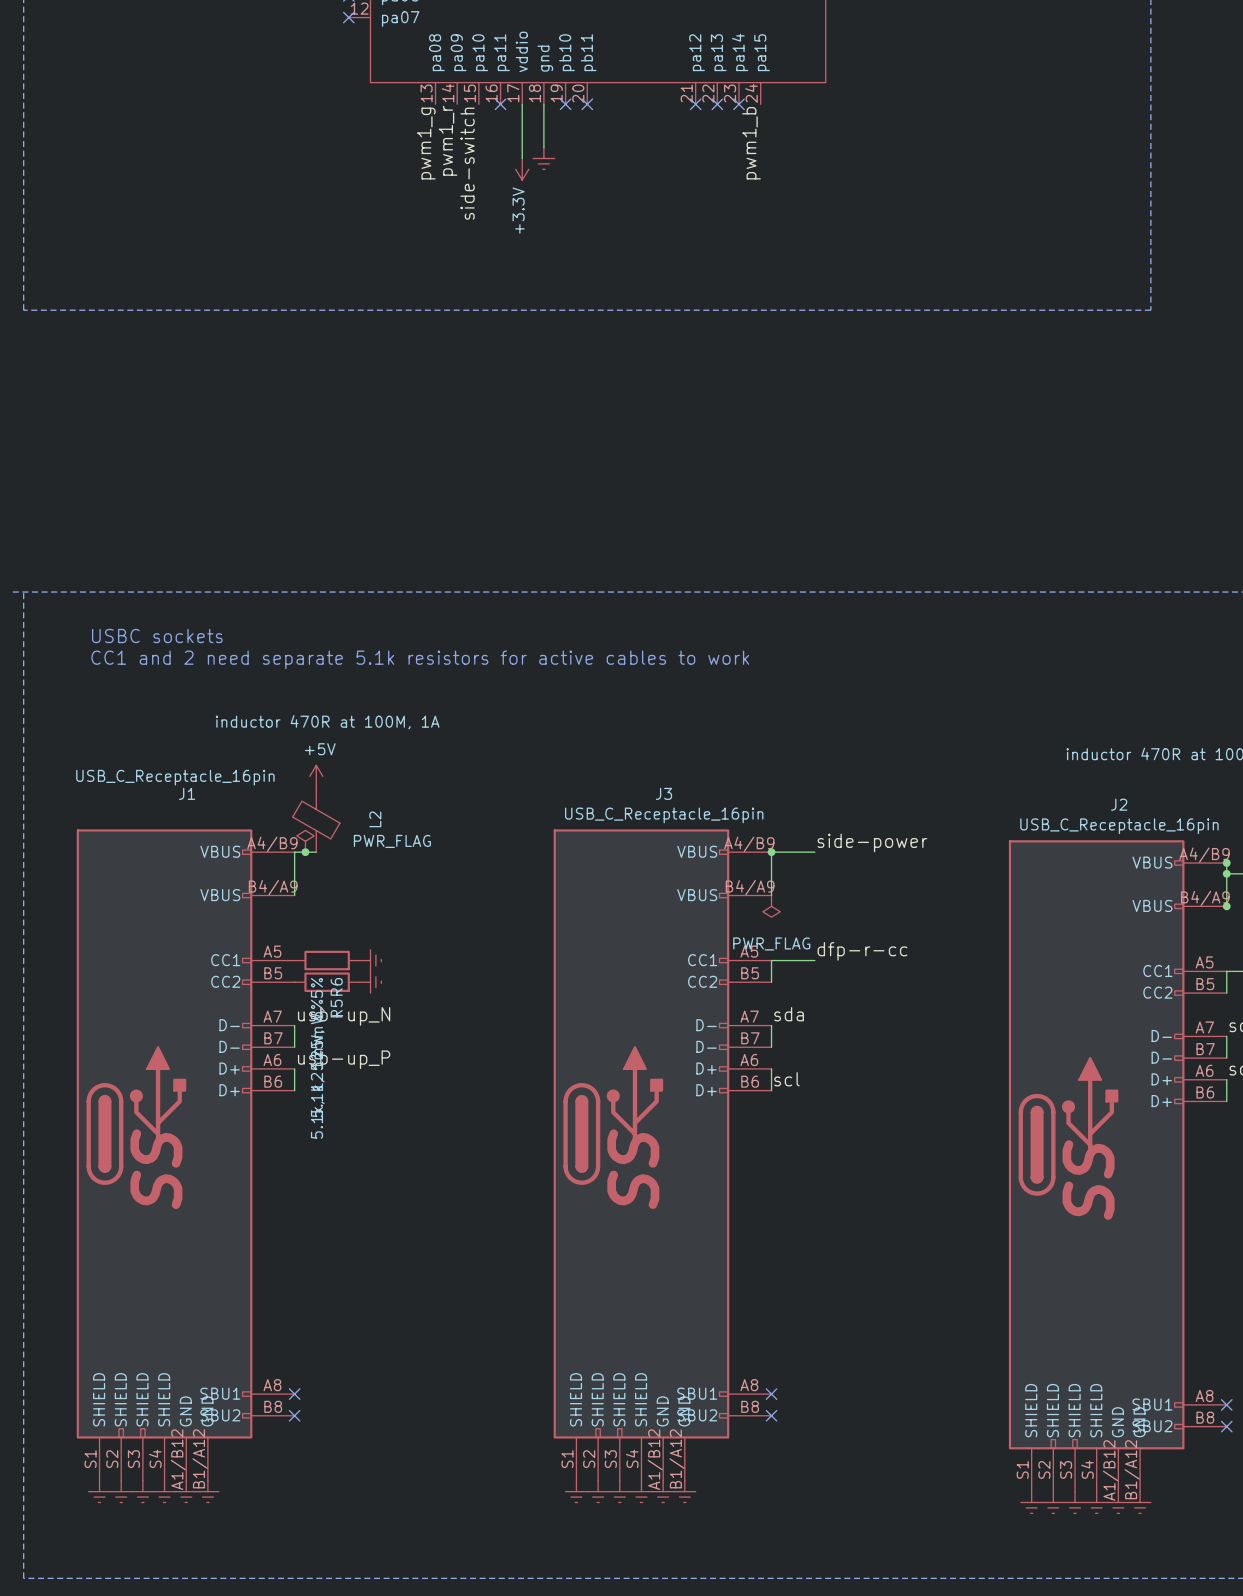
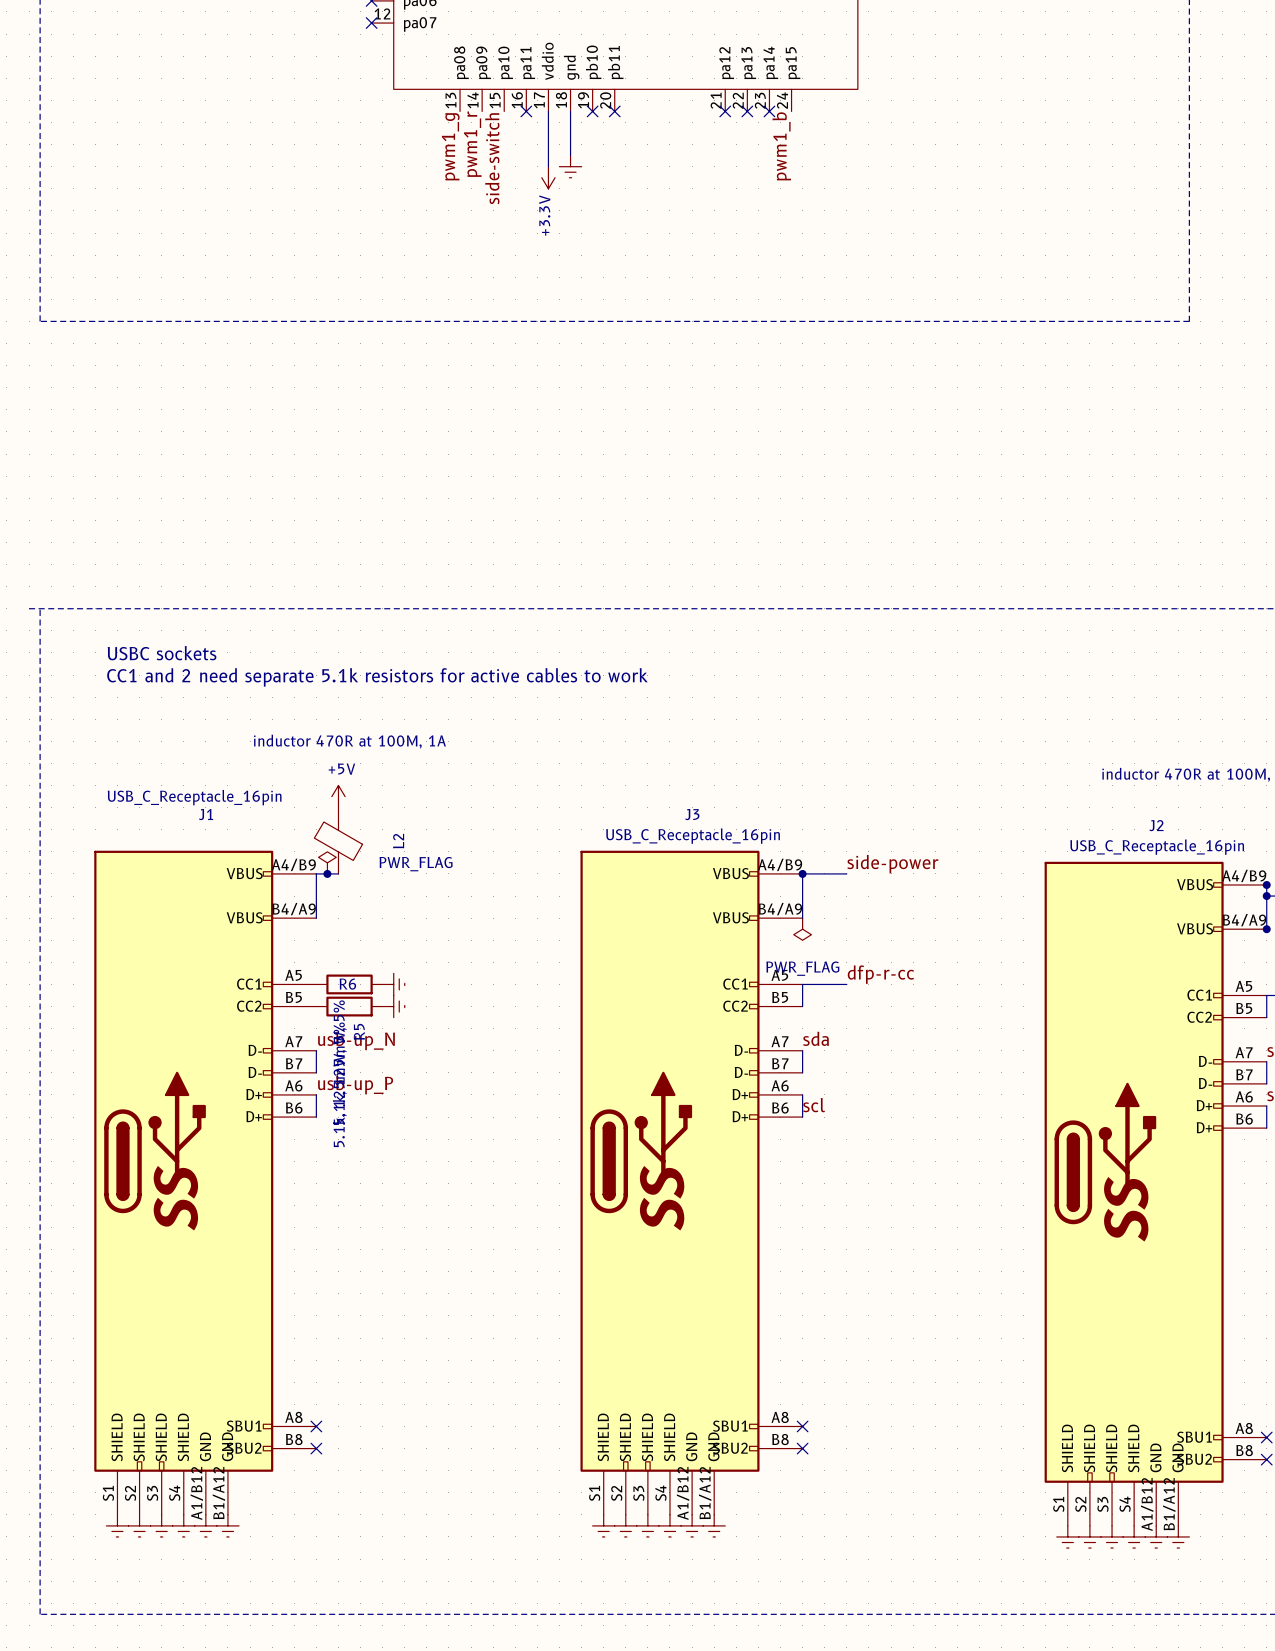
R6 name rotation: 0° (336, 986) -> 90° clockwise (347, 984)
R6 name position: R6 (336, 986) -> R6 (347, 984)

